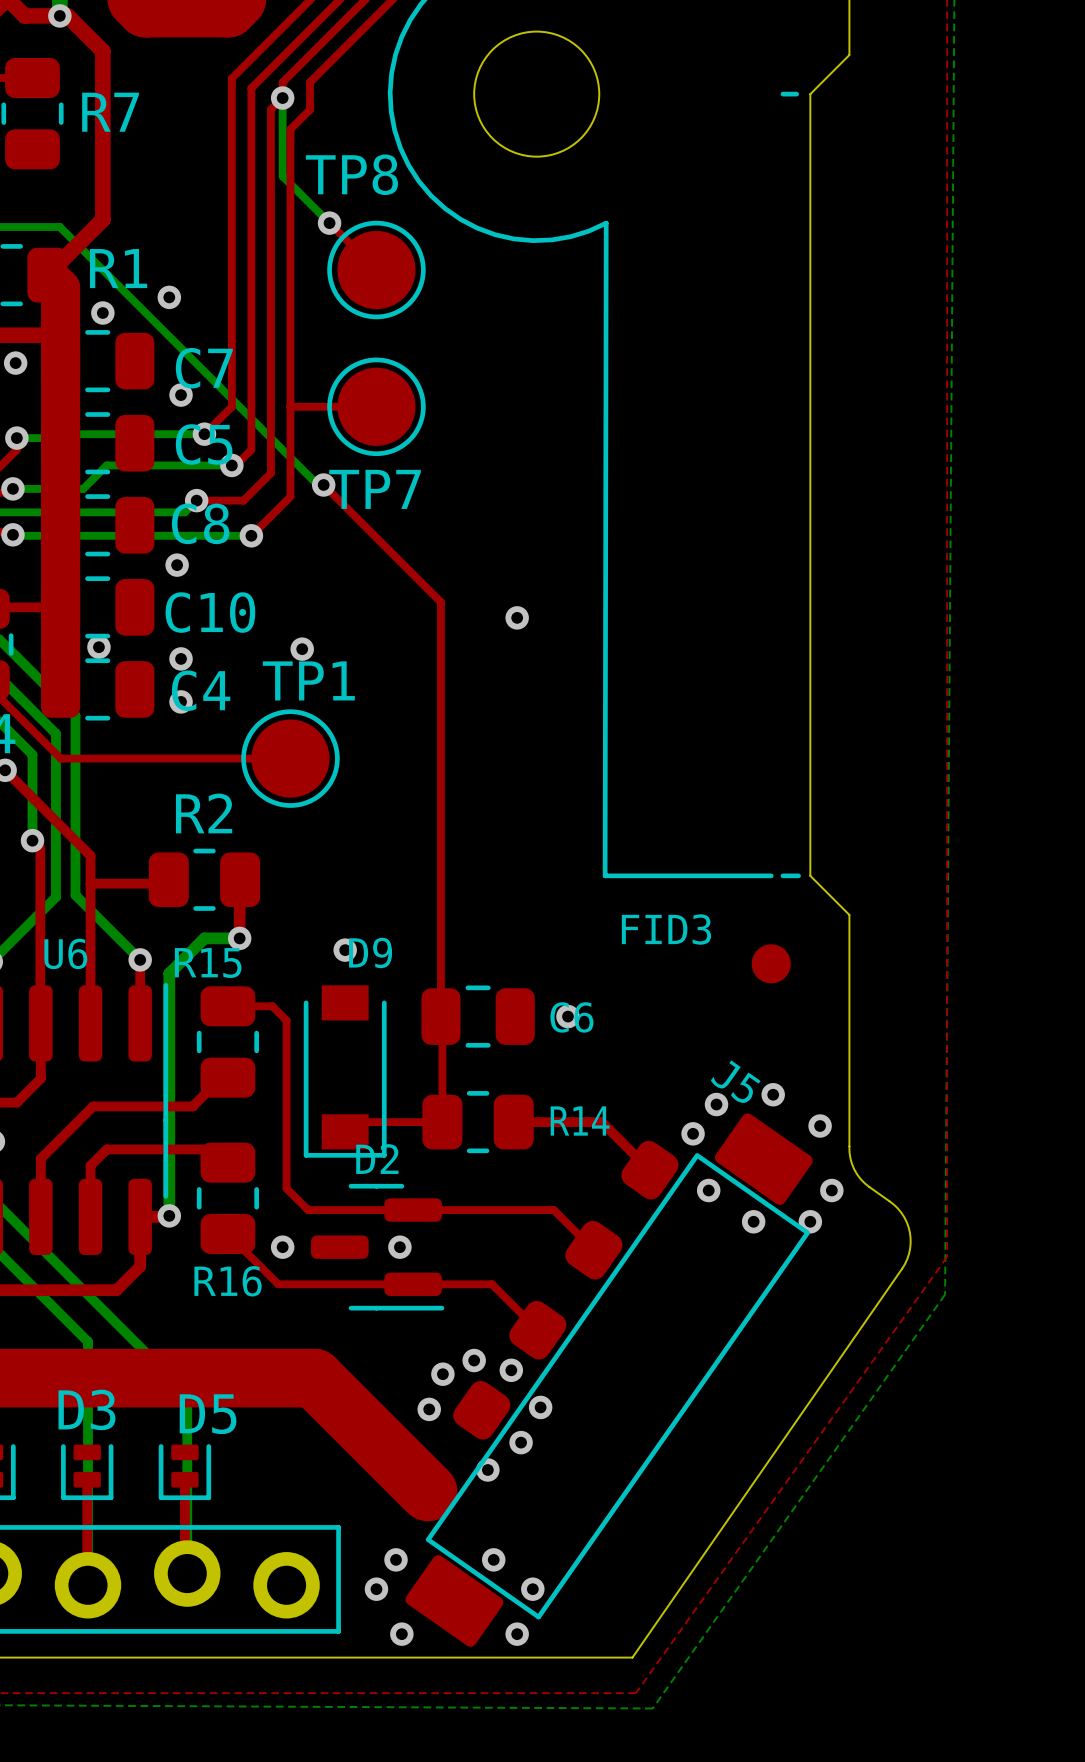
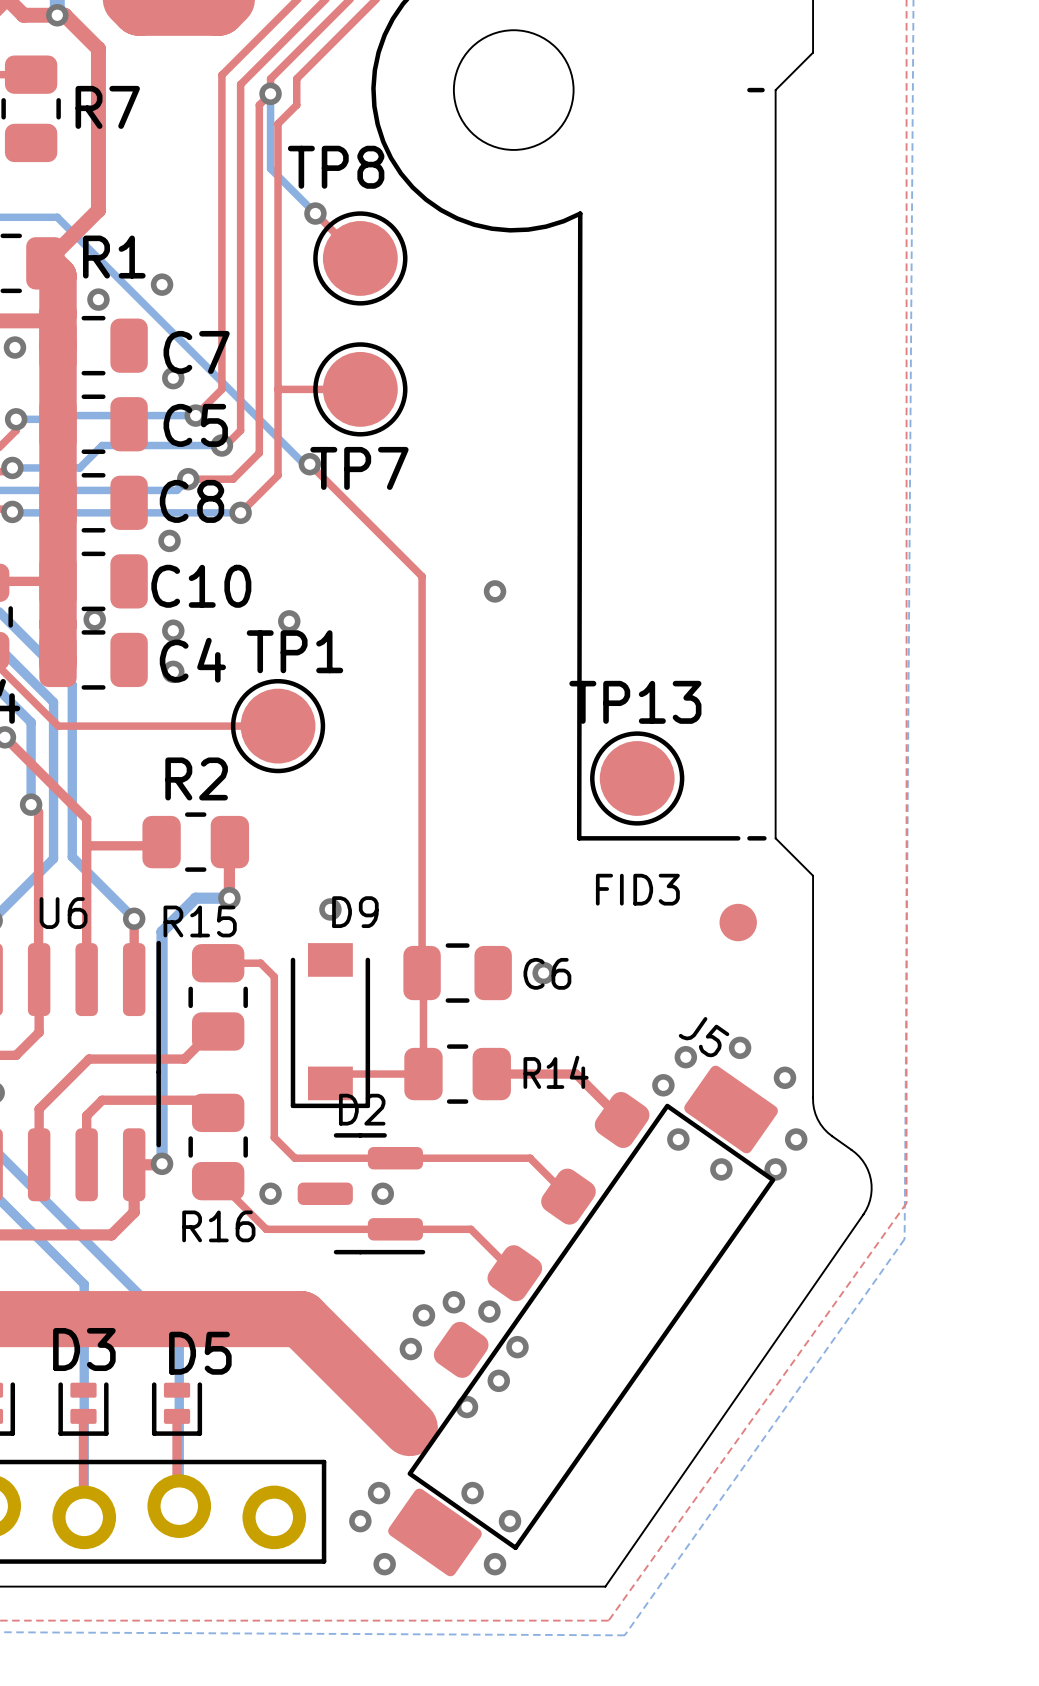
TP13: none -> (637, 778)

